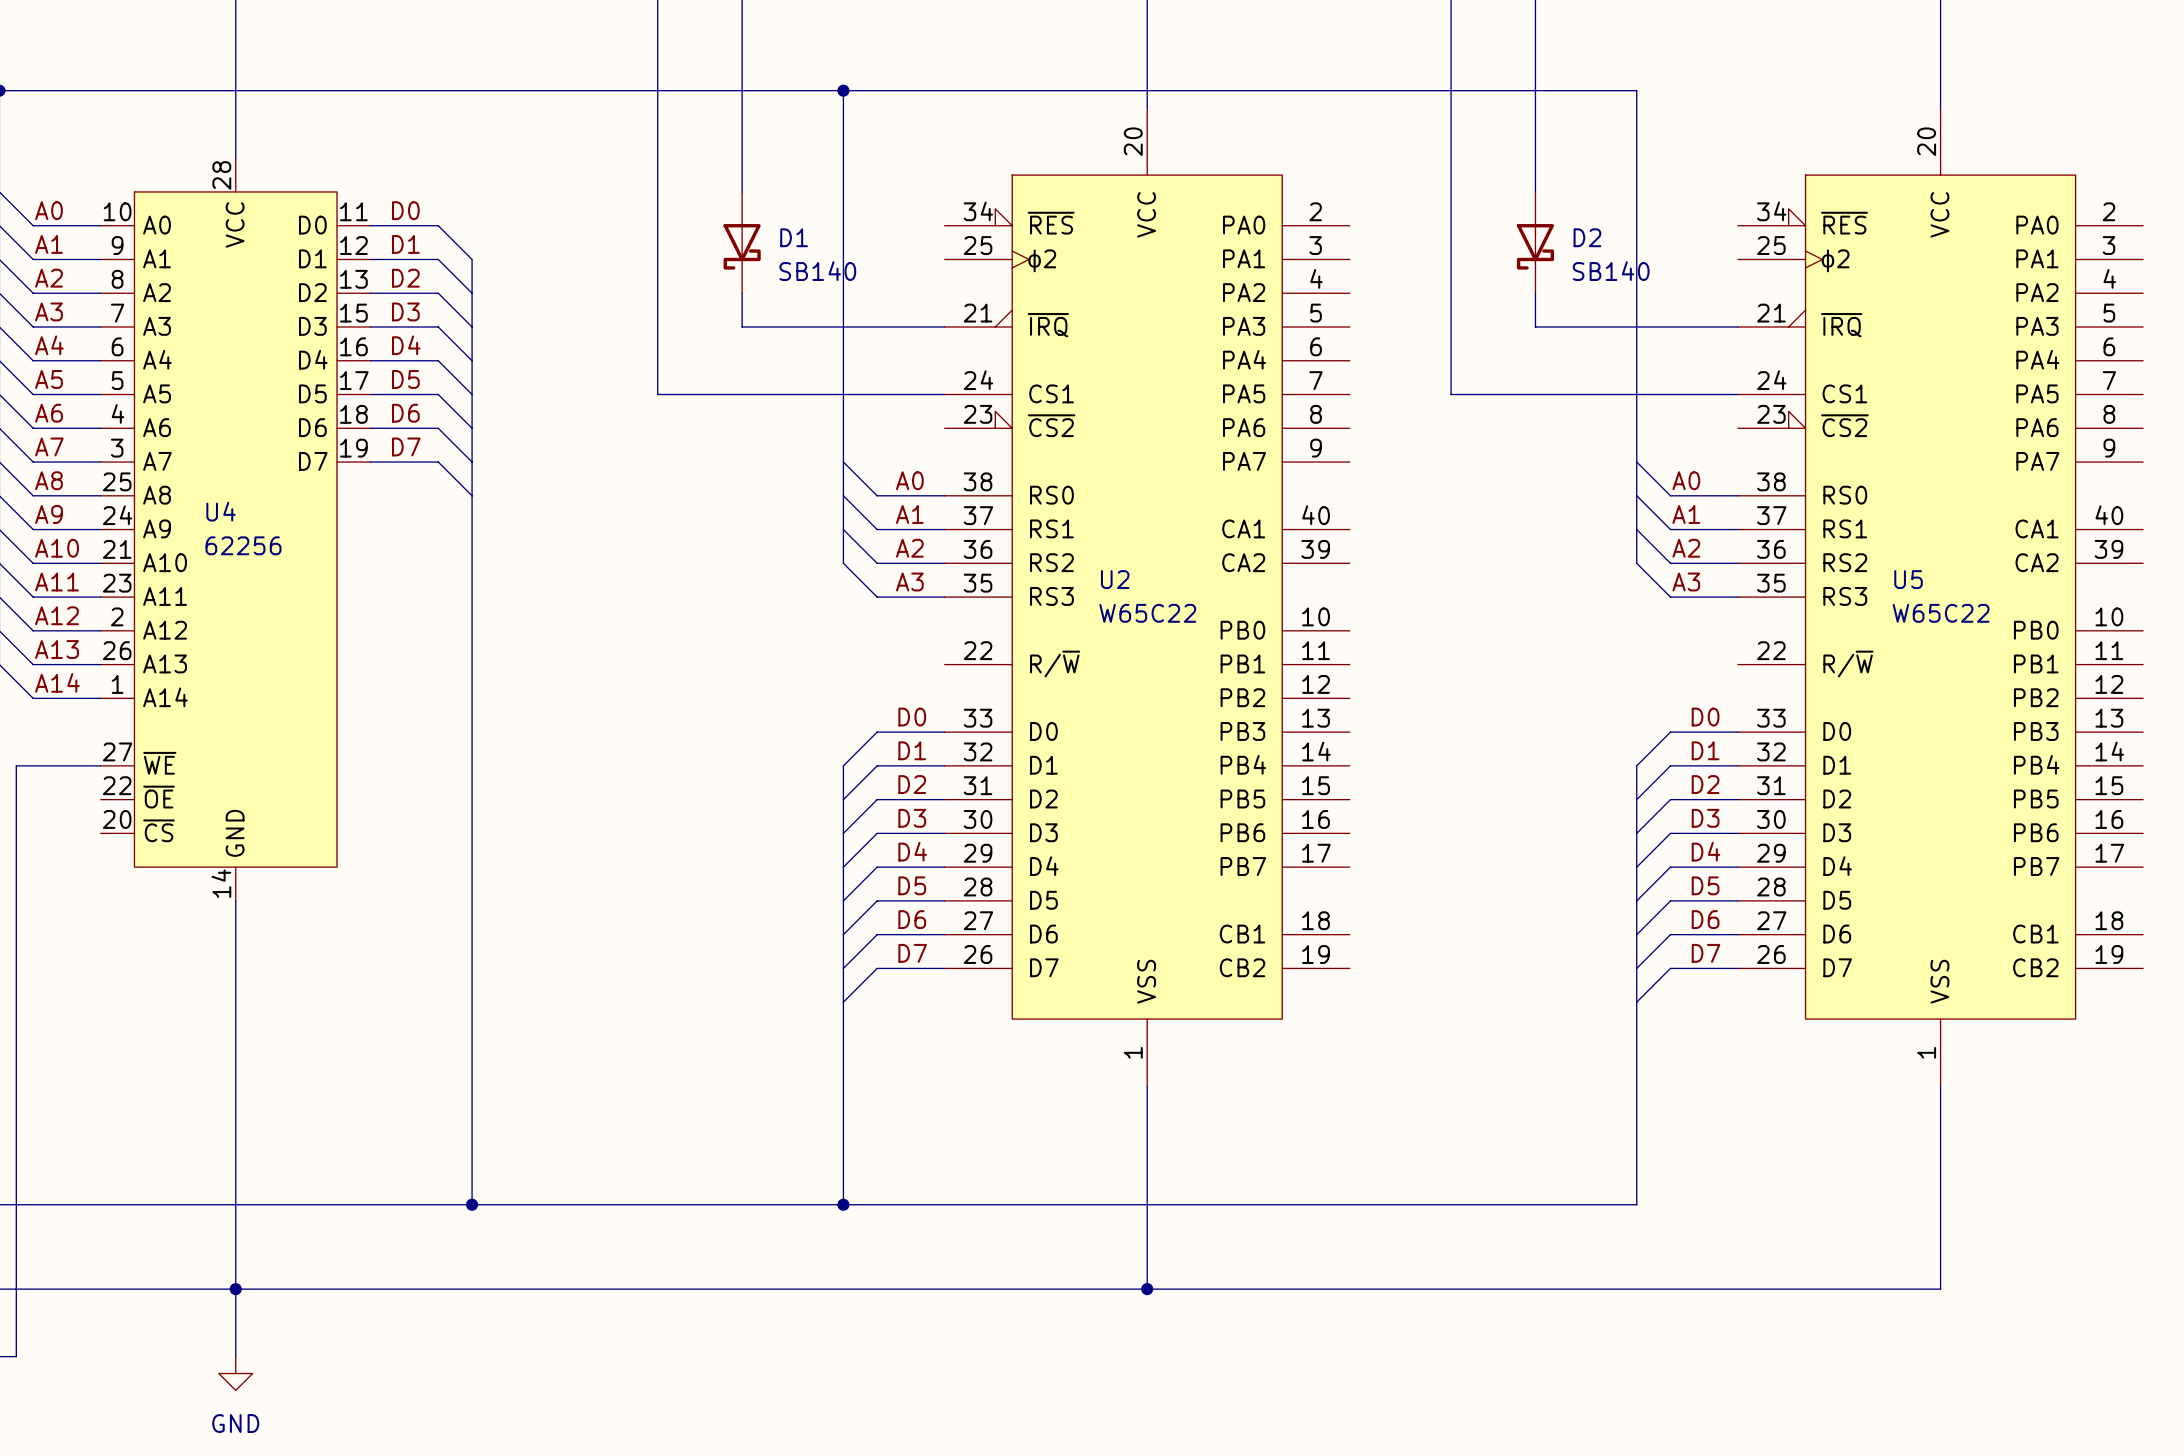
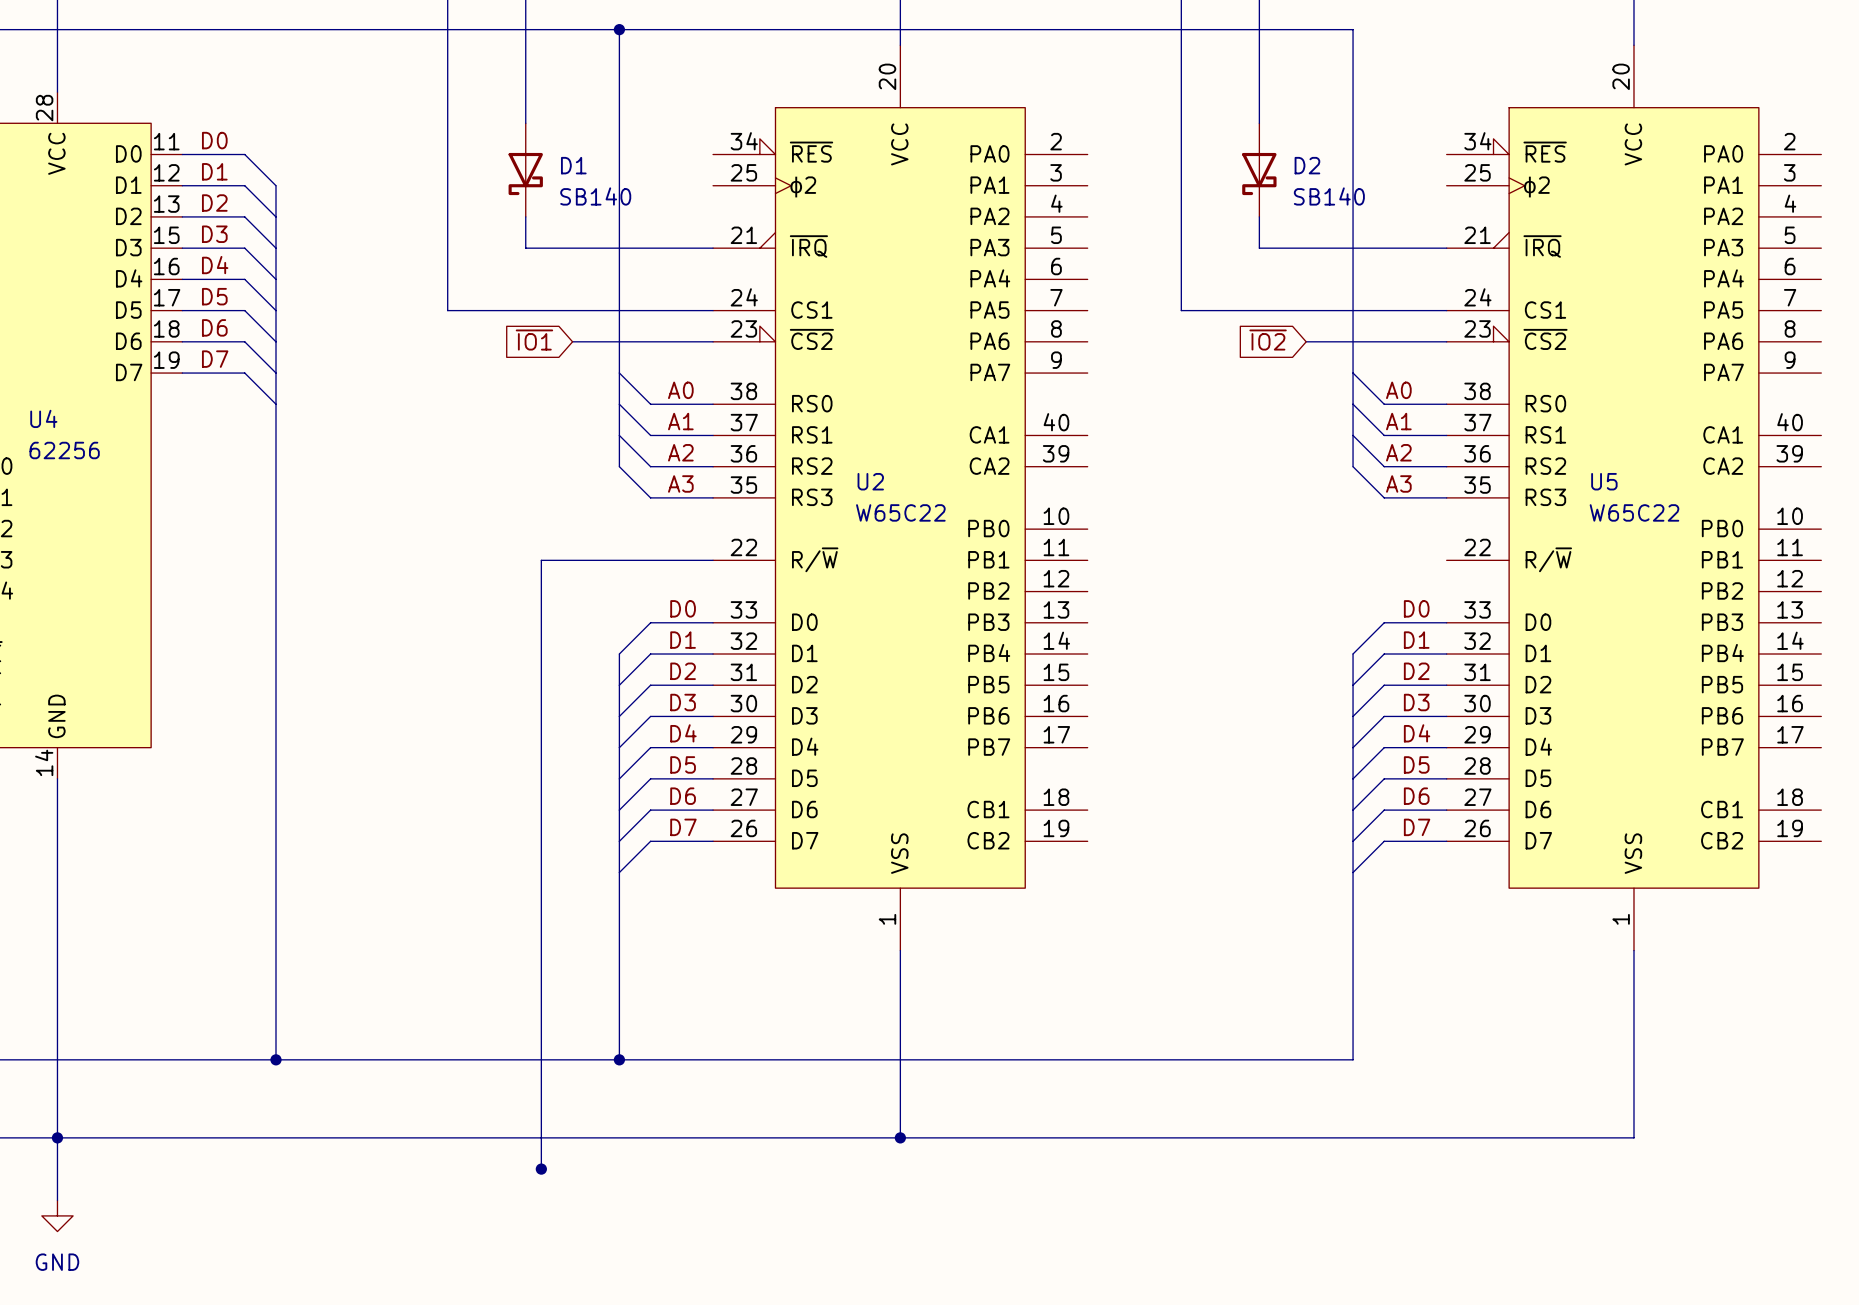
global label: none -> ~{IO1} (534, 340)
global label: none -> ~{IO2} (1268, 340)
wire: none -> (572, 341) (713, 341)
wire: none -> (1306, 341) (1446, 341)
wire: none -> (713, 560) (541, 560) (541, 1169)
junction: none -> (541, 1169)

